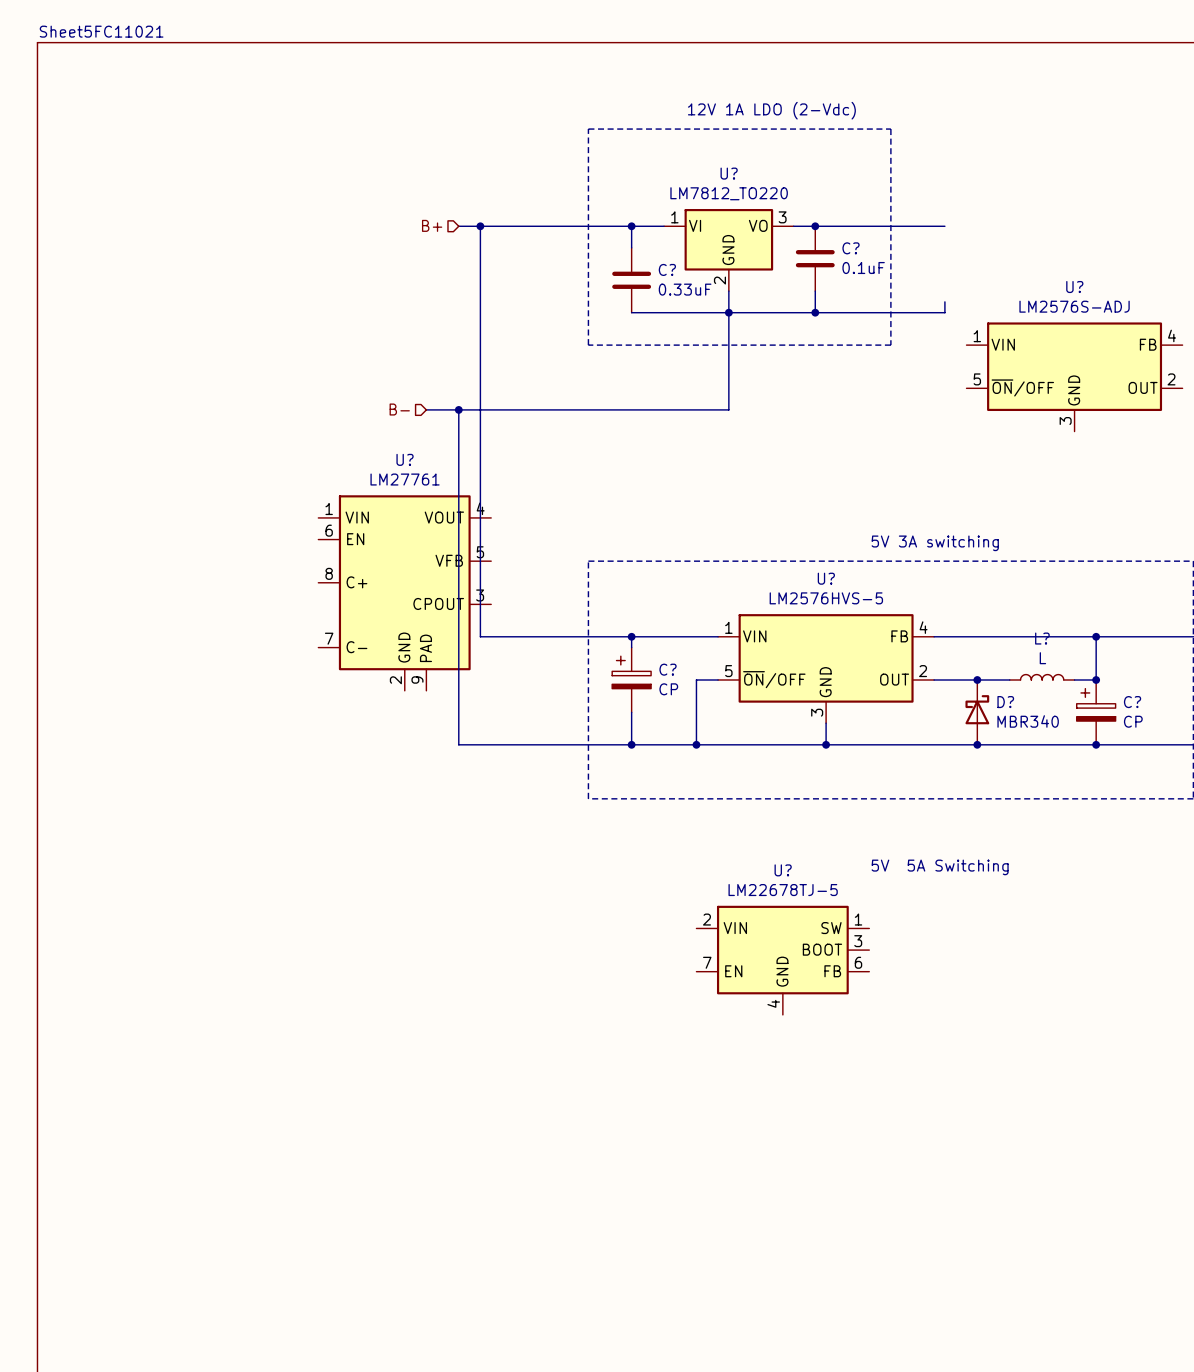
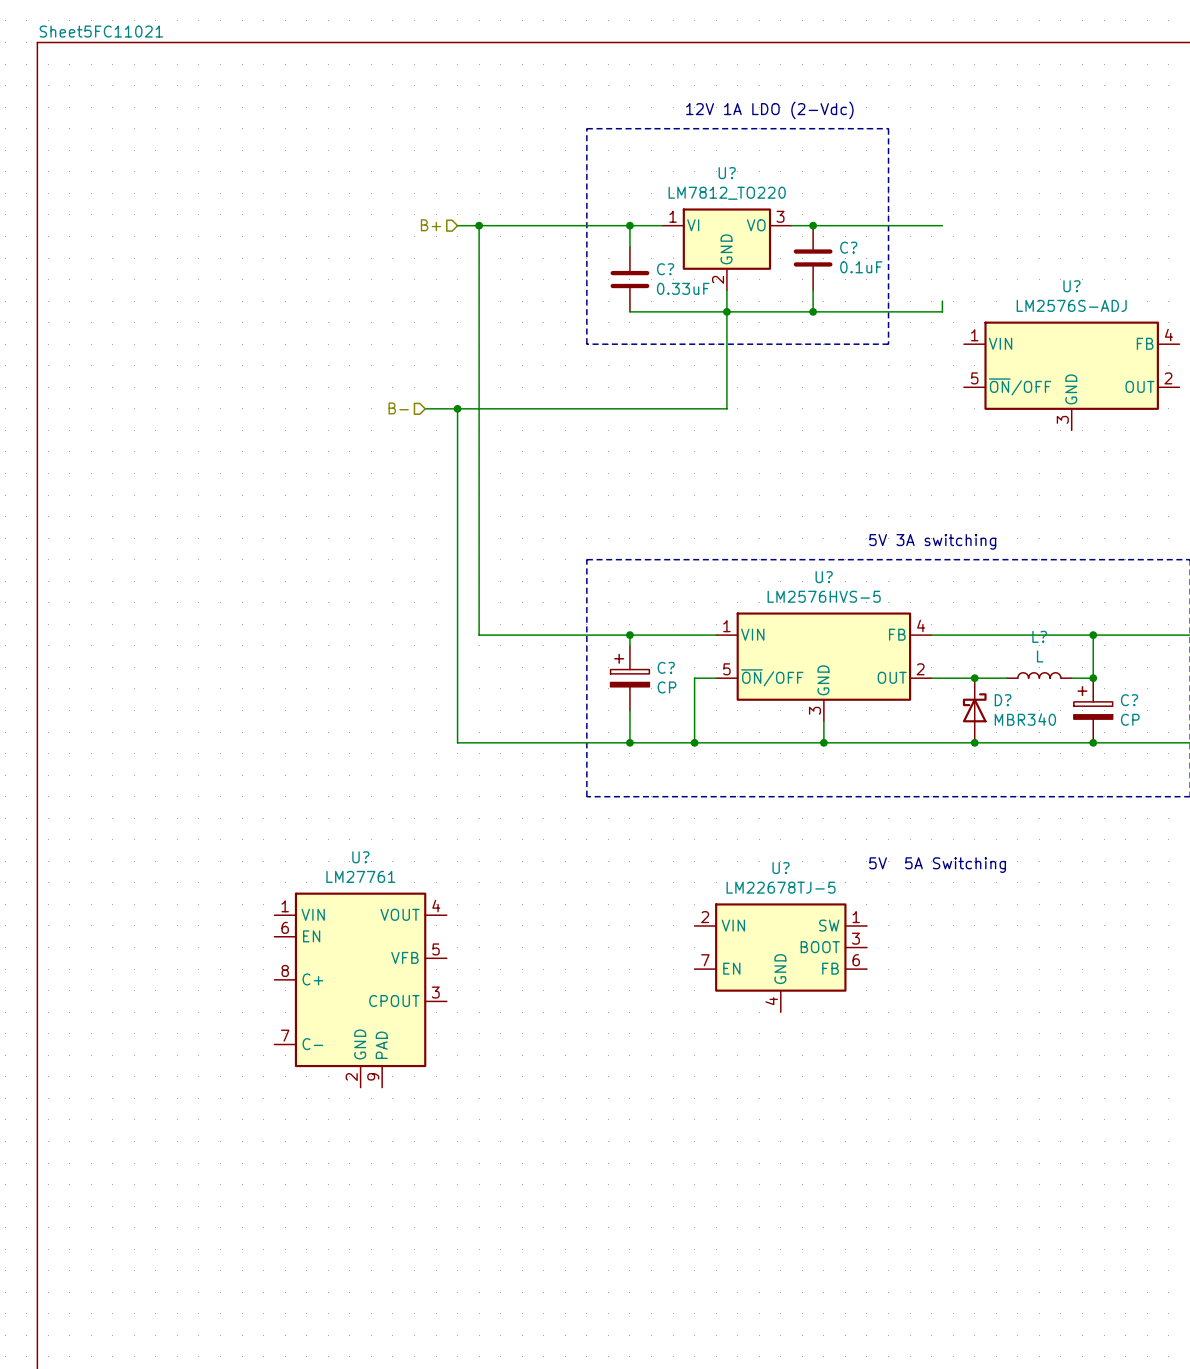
U?: LM27761 (404, 593) -> none
U?: none -> LM27761 (360, 990)

